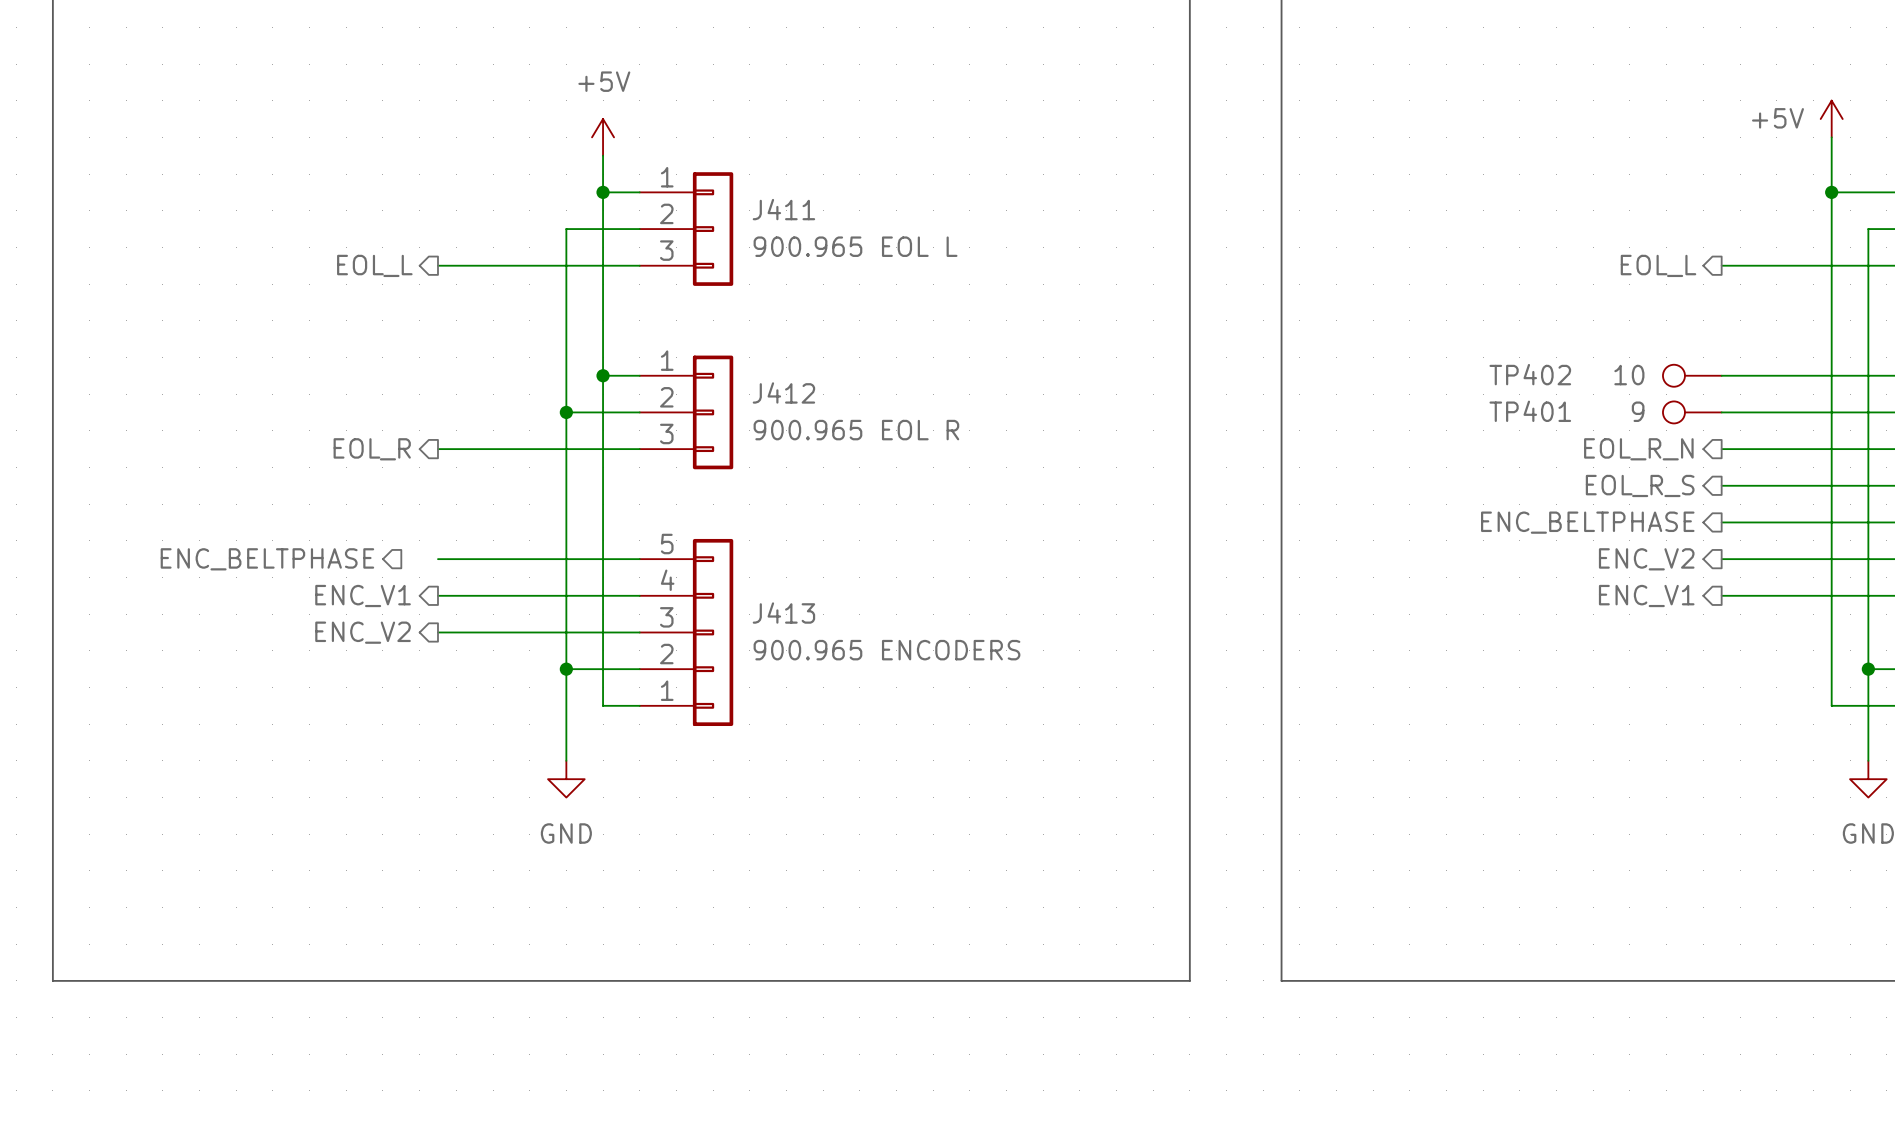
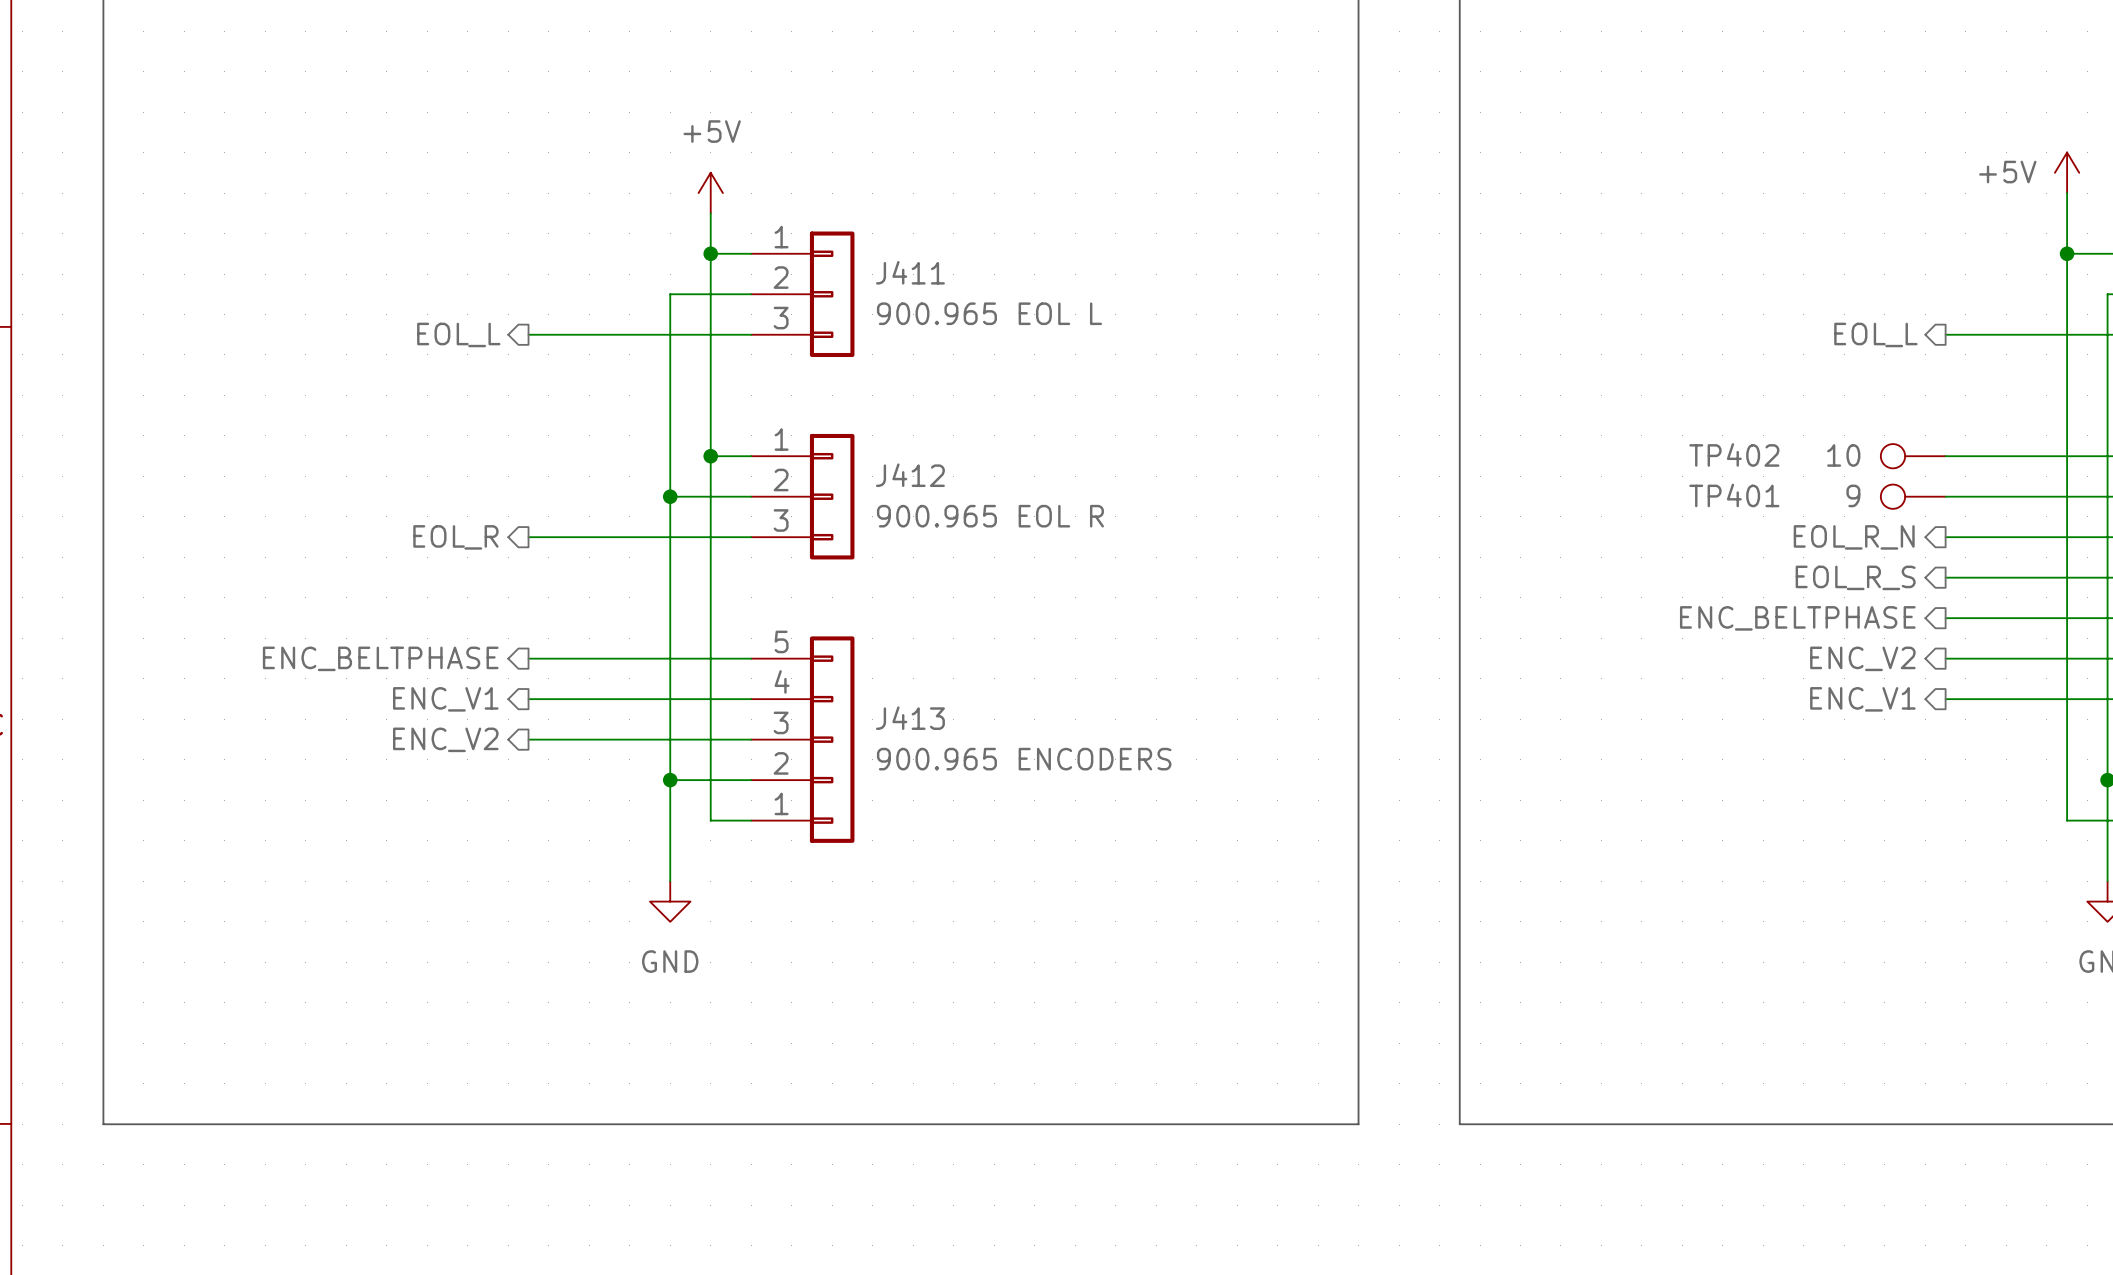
hierarchical label position: ENC_BELTPHASE (267, 559) -> ENC_BELTPHASE (380, 658)

